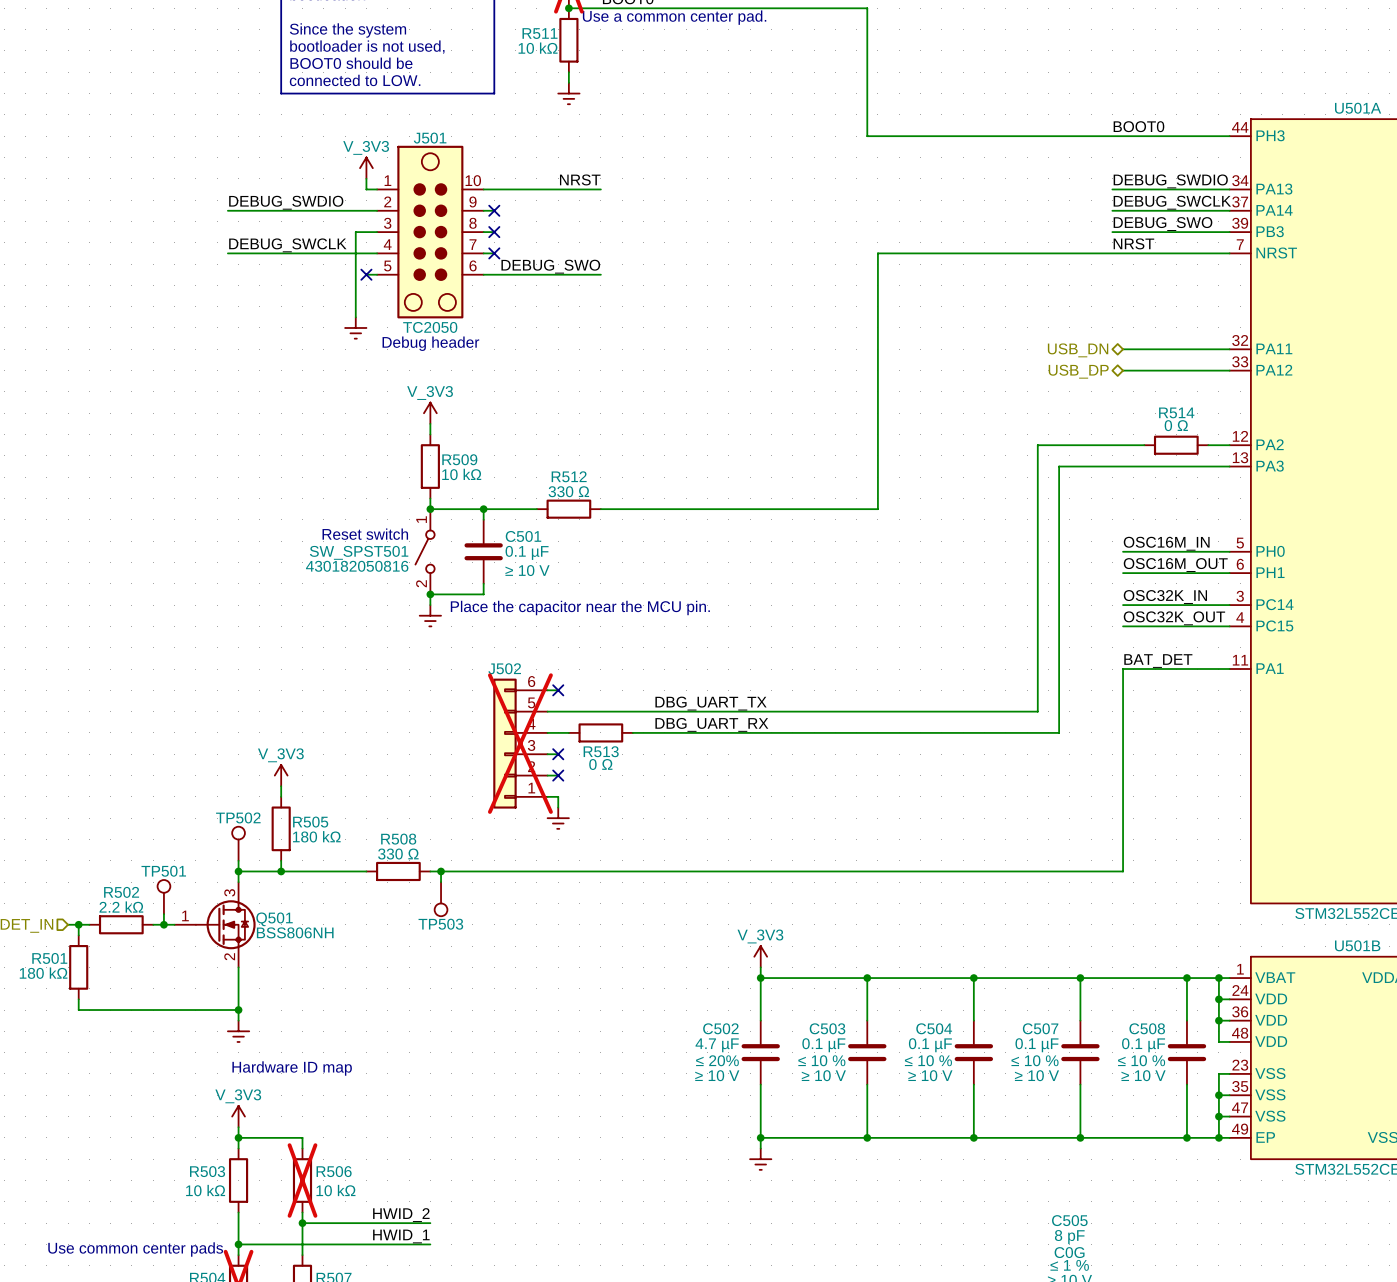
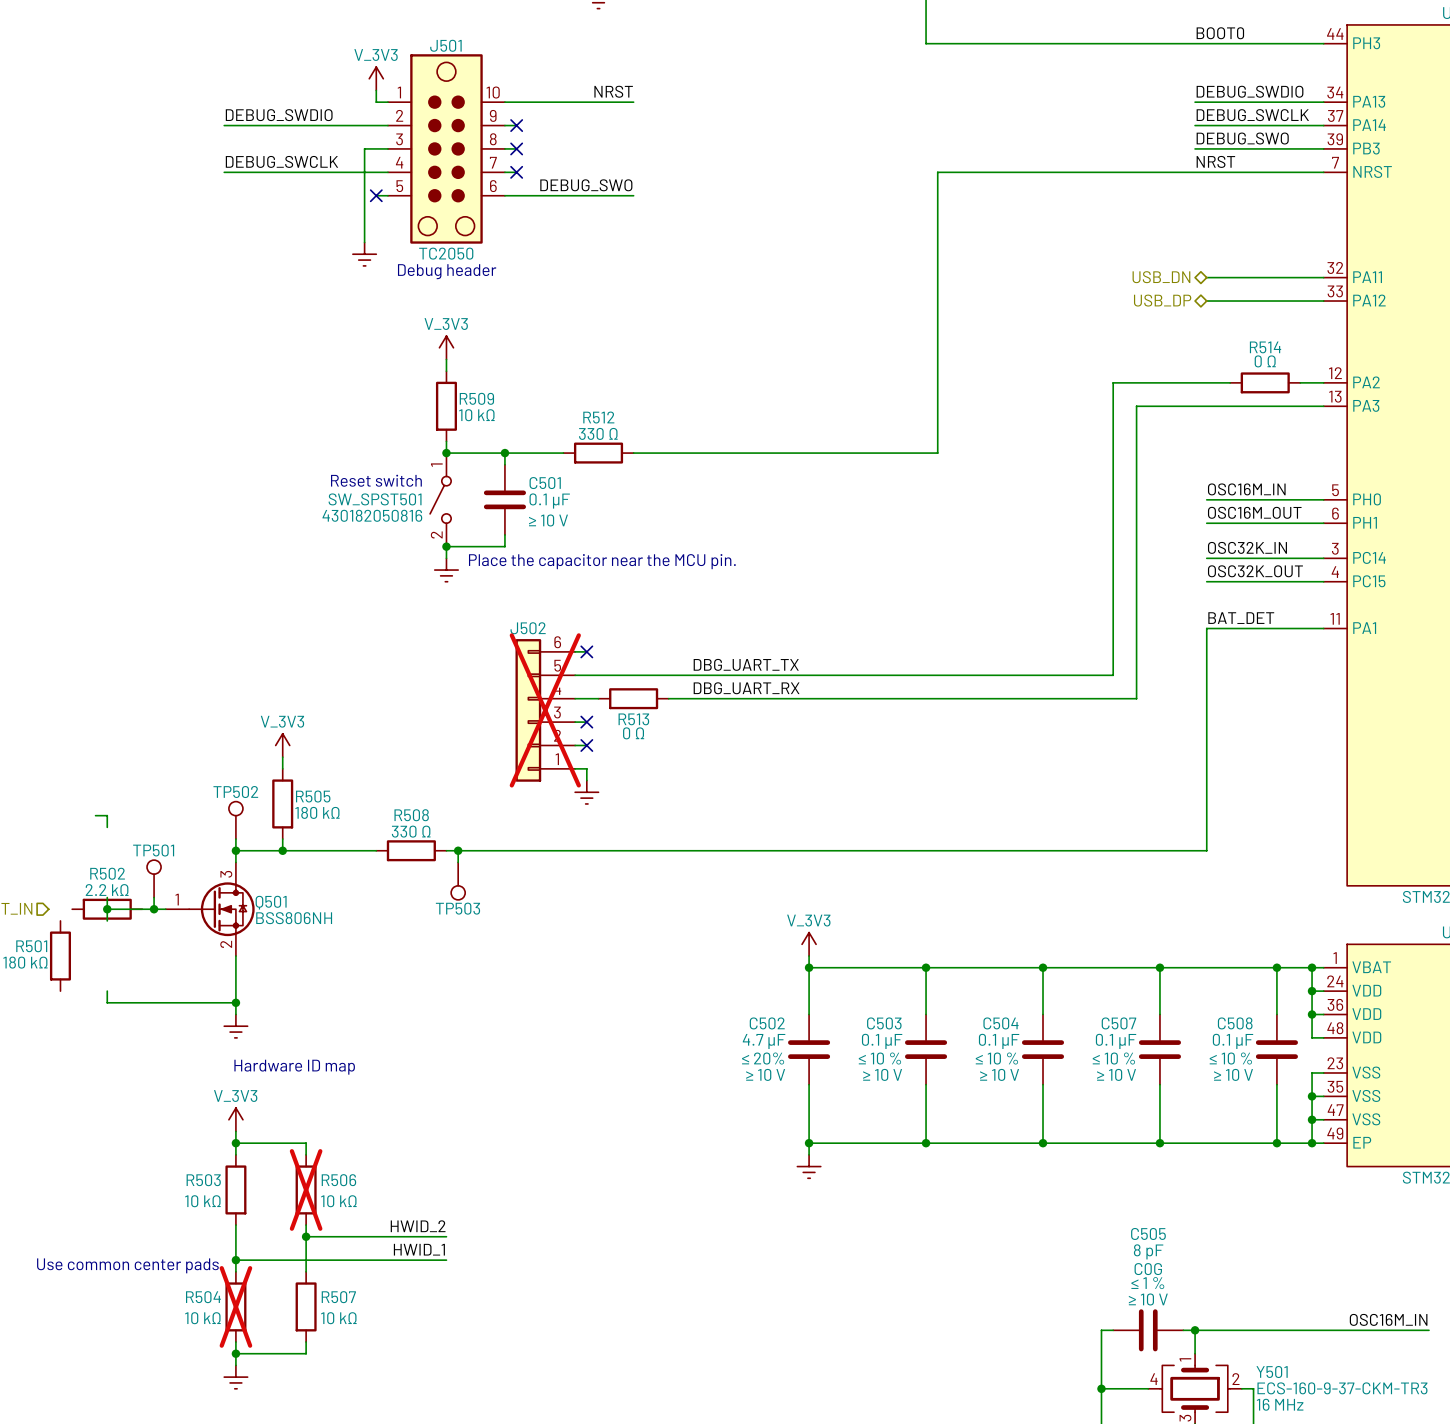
wire: none -> (95, 815) (107, 815) (107, 827)
wire: none -> (107, 897) (107, 920)
wire: (68, 924) (89, 924) -> none
wire: (78, 924) (78, 935) -> none
junction position: (78, 924) -> (107, 909)
wire: none -> (107, 909) (142, 909)
wire: (78, 999) (78, 1010) (121, 1010) -> (107, 991) (107, 1002)

